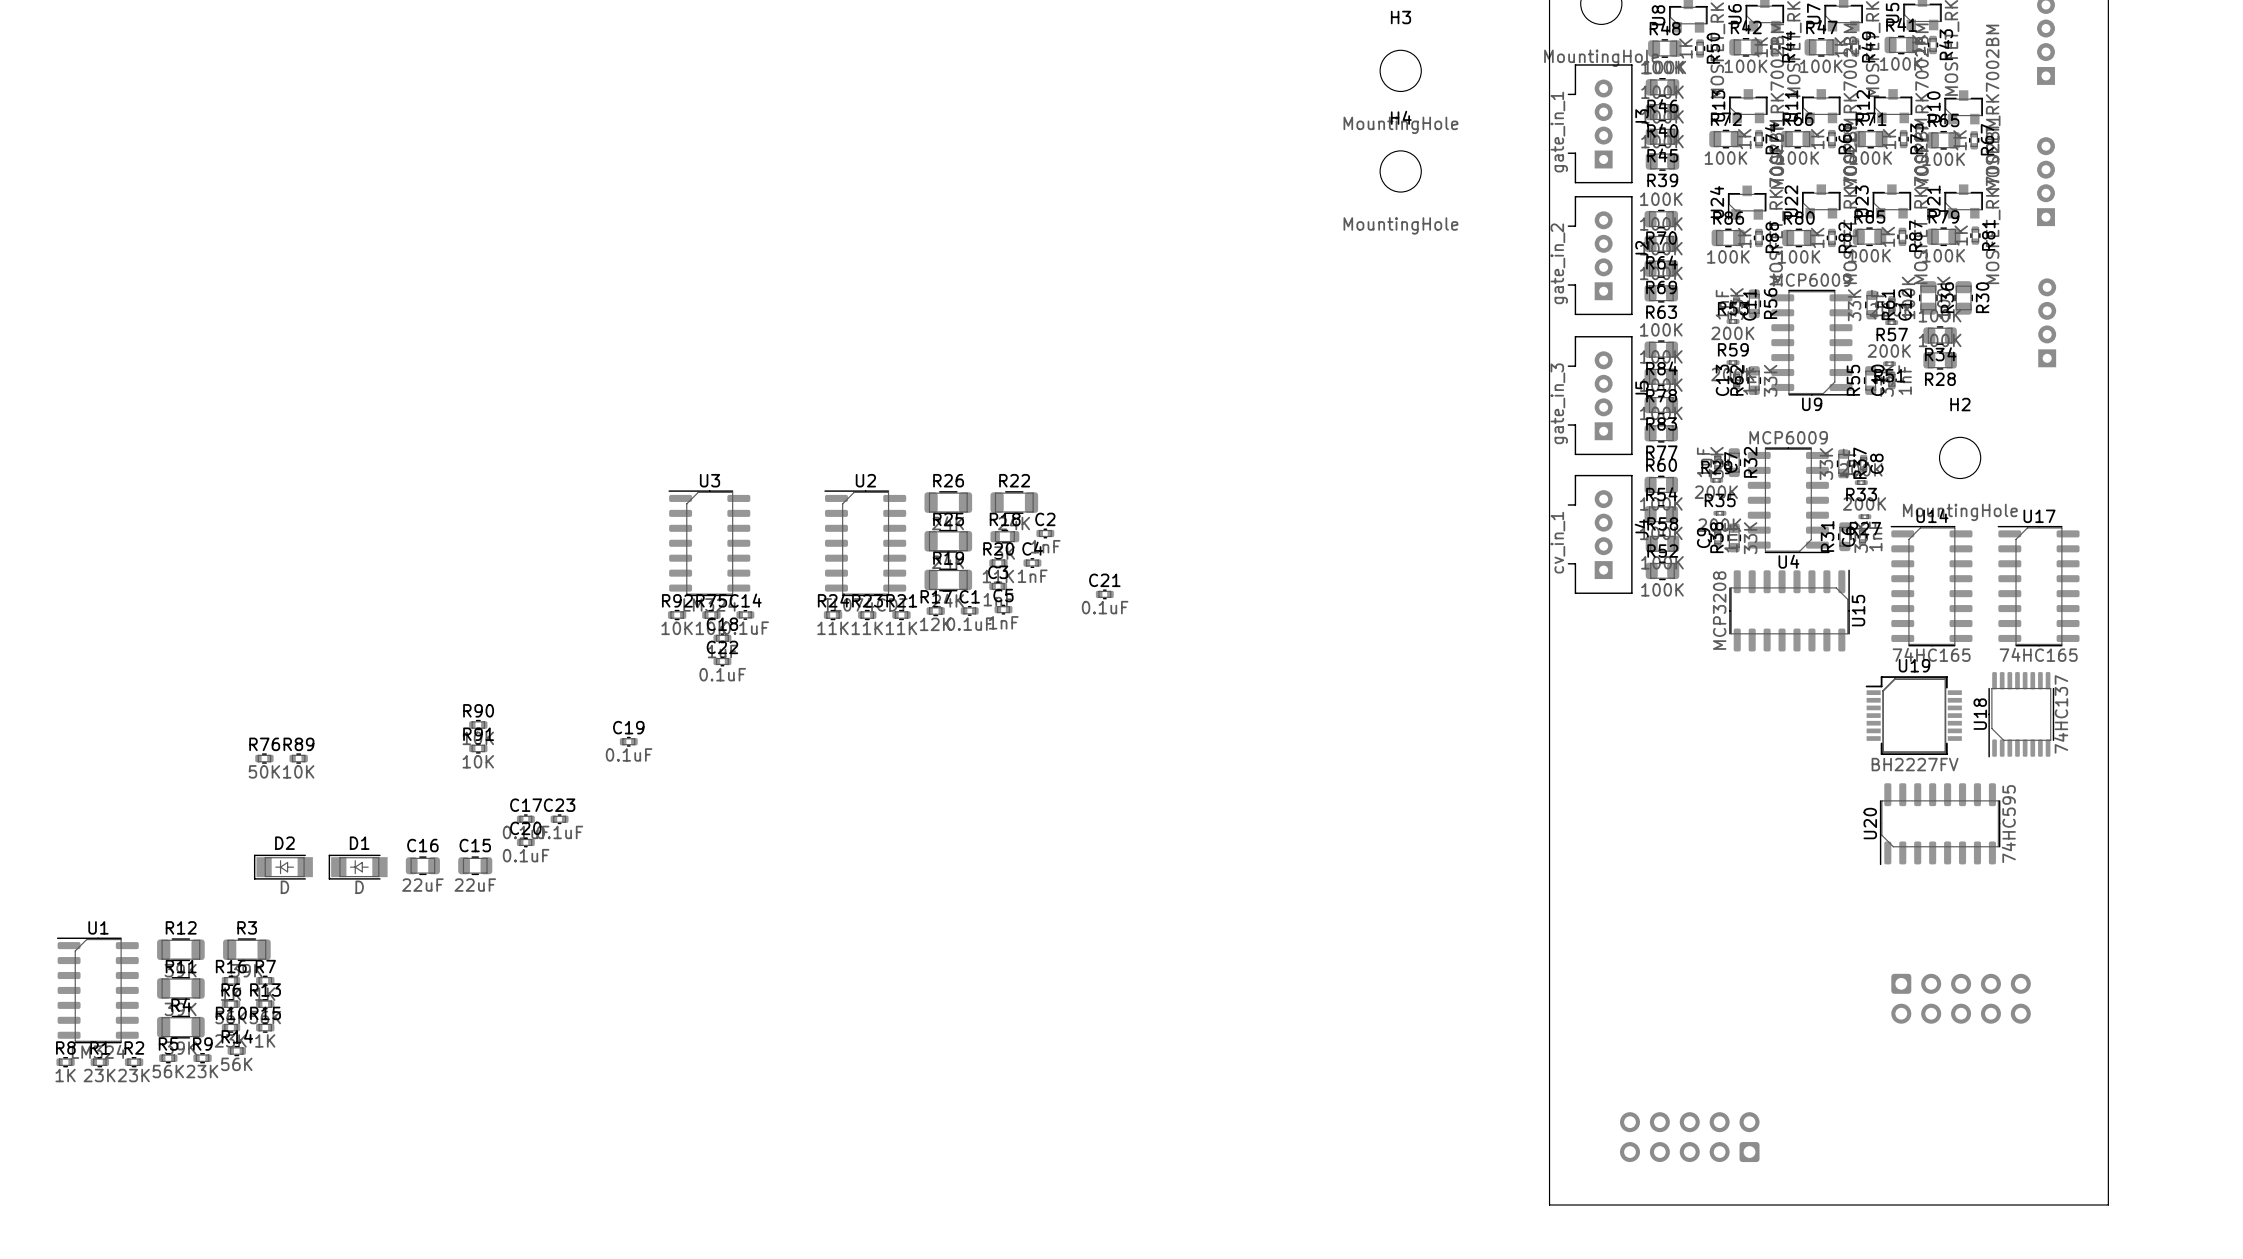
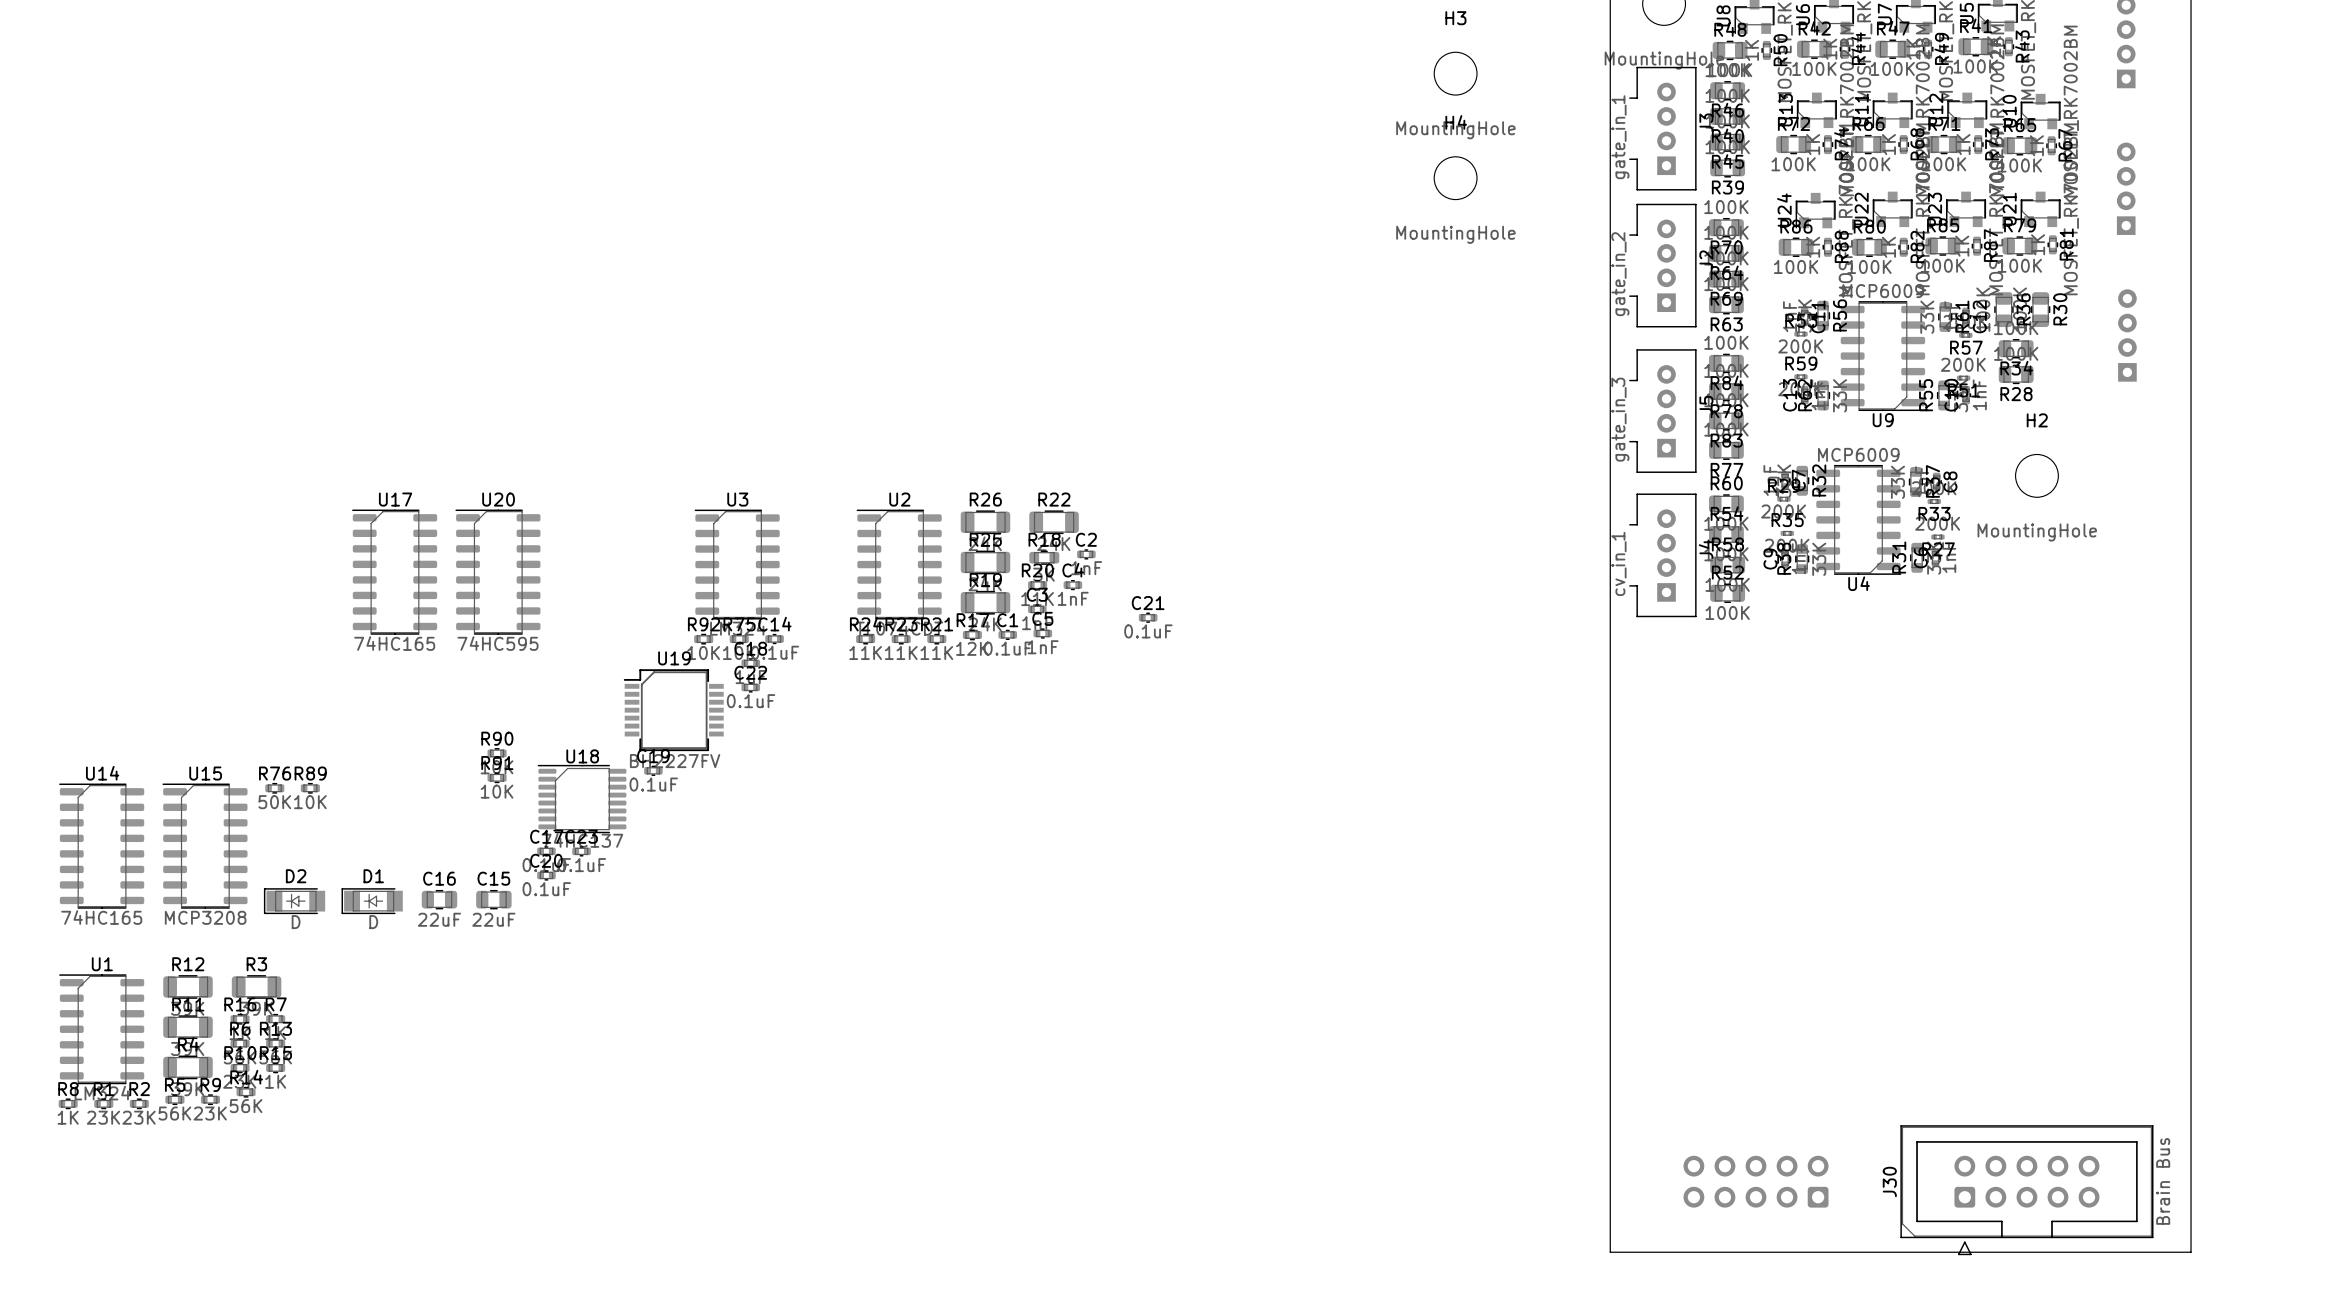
U14 position: (1931, 586) -> (101, 846)
U17 position: (2038, 586) -> (394, 572)
U15 rotation: 0° (1789, 610) -> 90° counterclockwise (204, 846)
U15 position: (1789, 610) -> (204, 846)
U18 rotation: 0° (2021, 714) -> 90° clockwise (582, 799)
U18 position: (2021, 714) -> (582, 799)
U19 position: (1913, 715) -> (673, 710)
U20 rotation: 0° (1940, 824) -> 90° clockwise (497, 572)
U20 position: (1940, 824) -> (497, 572)
J30 side: bottom (1961, 998) -> top (2026, 1190)

